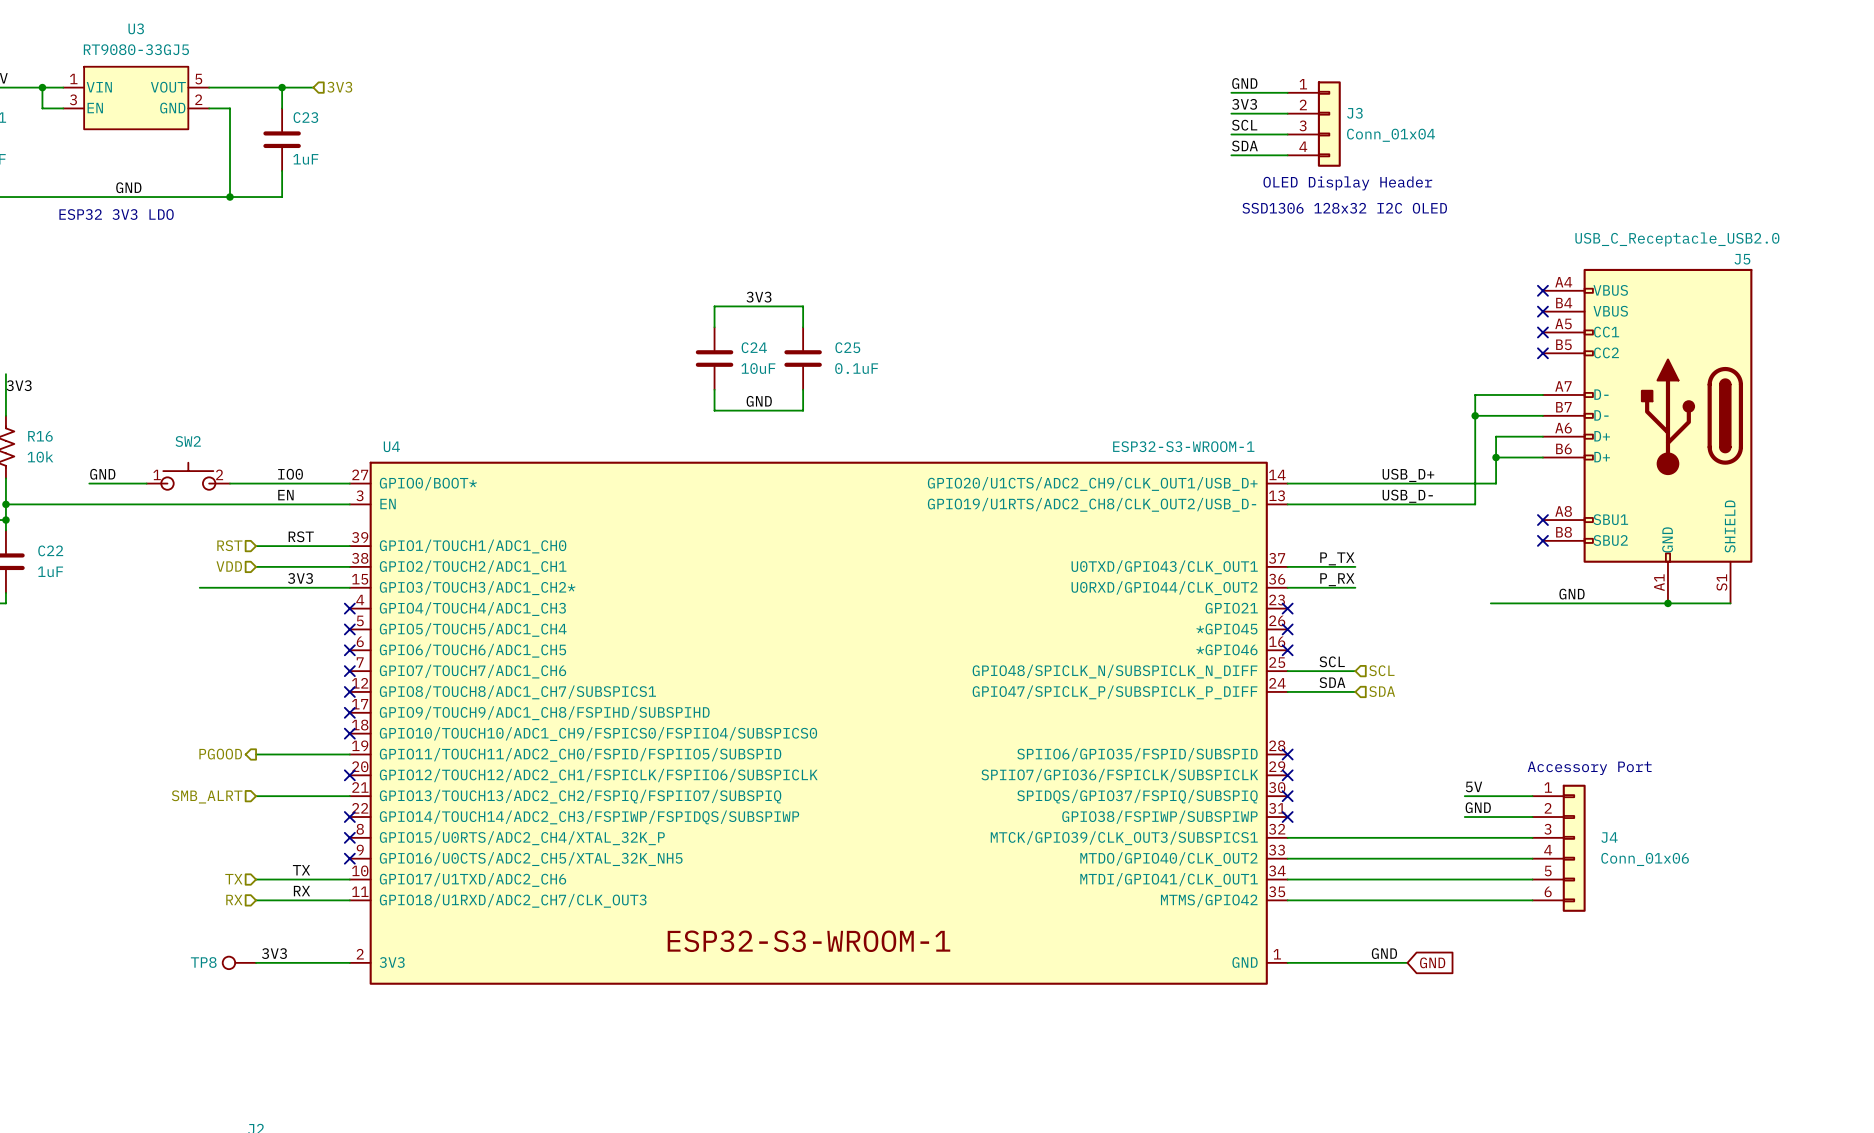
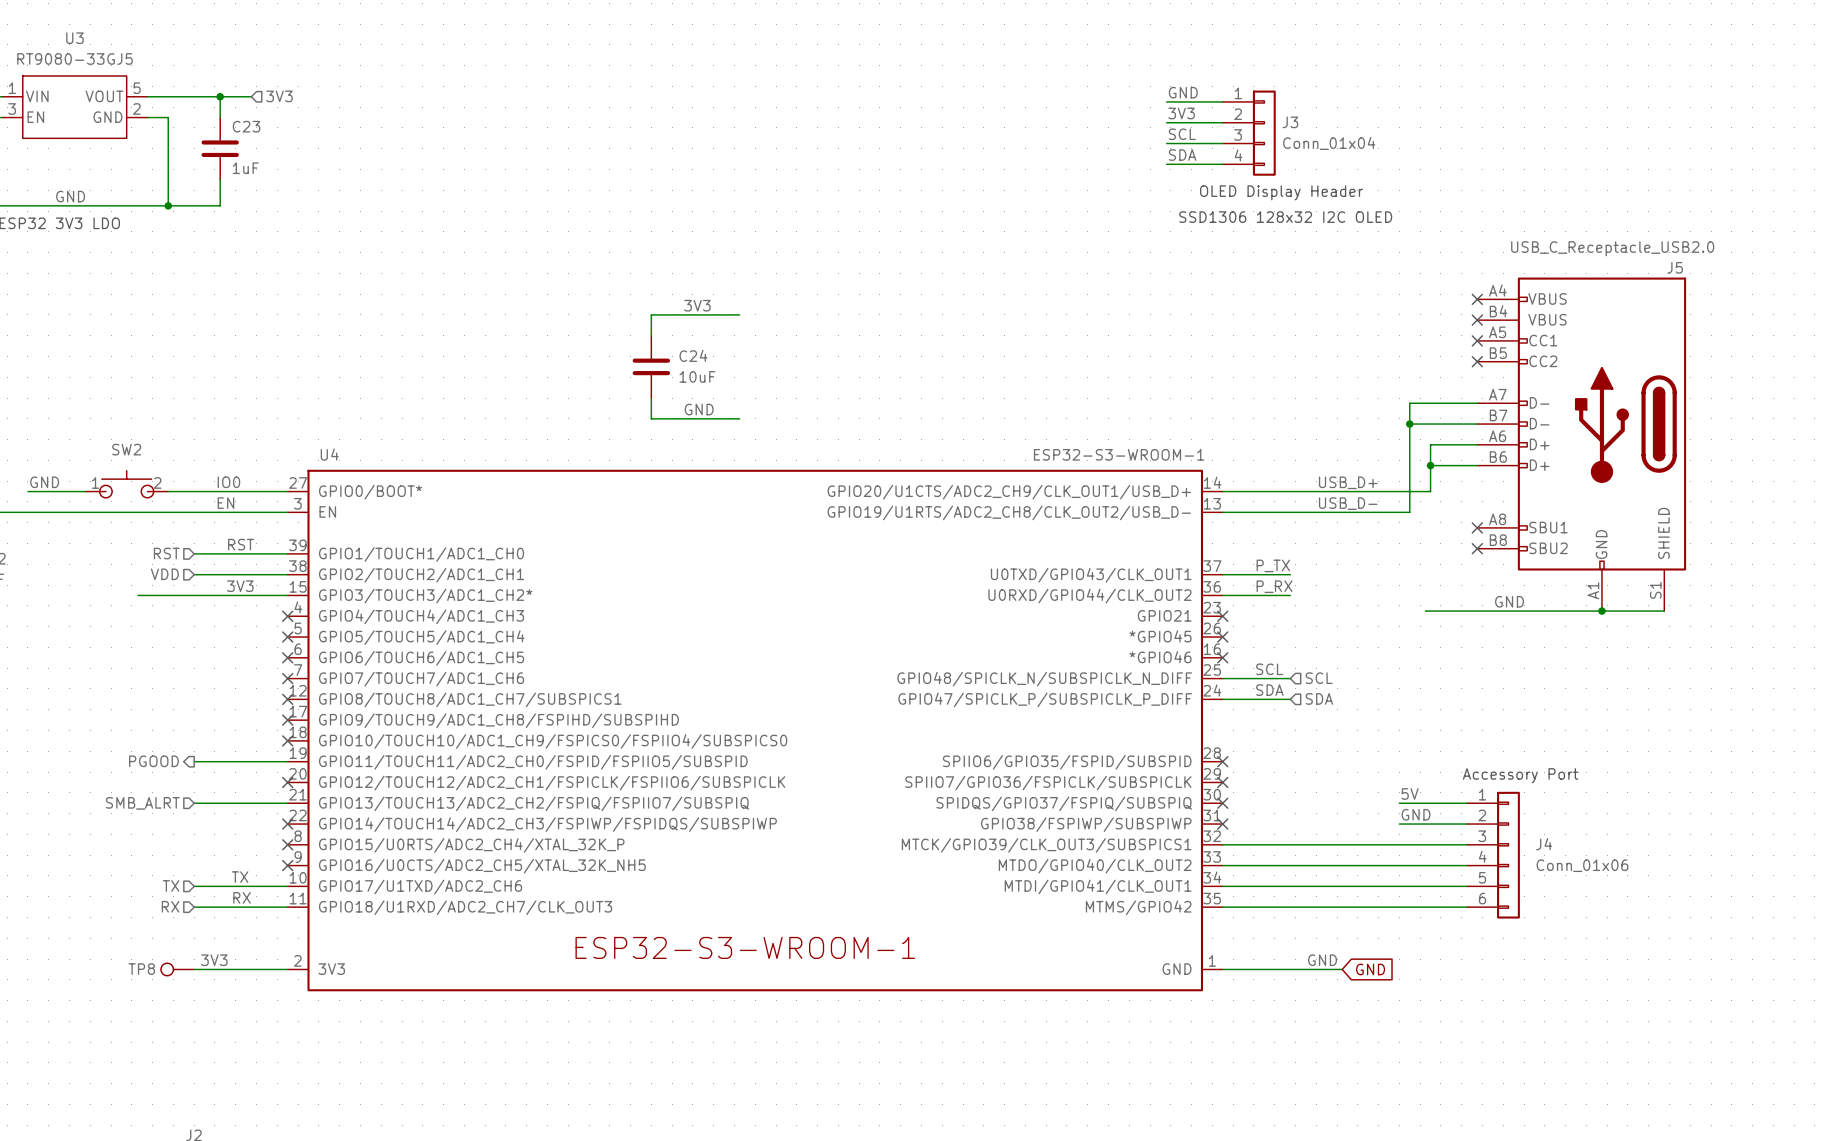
wire: (803, 306) (803, 327) -> none
C25: 0.1uF (803, 358) -> none
wire: (803, 389) (803, 410) -> none

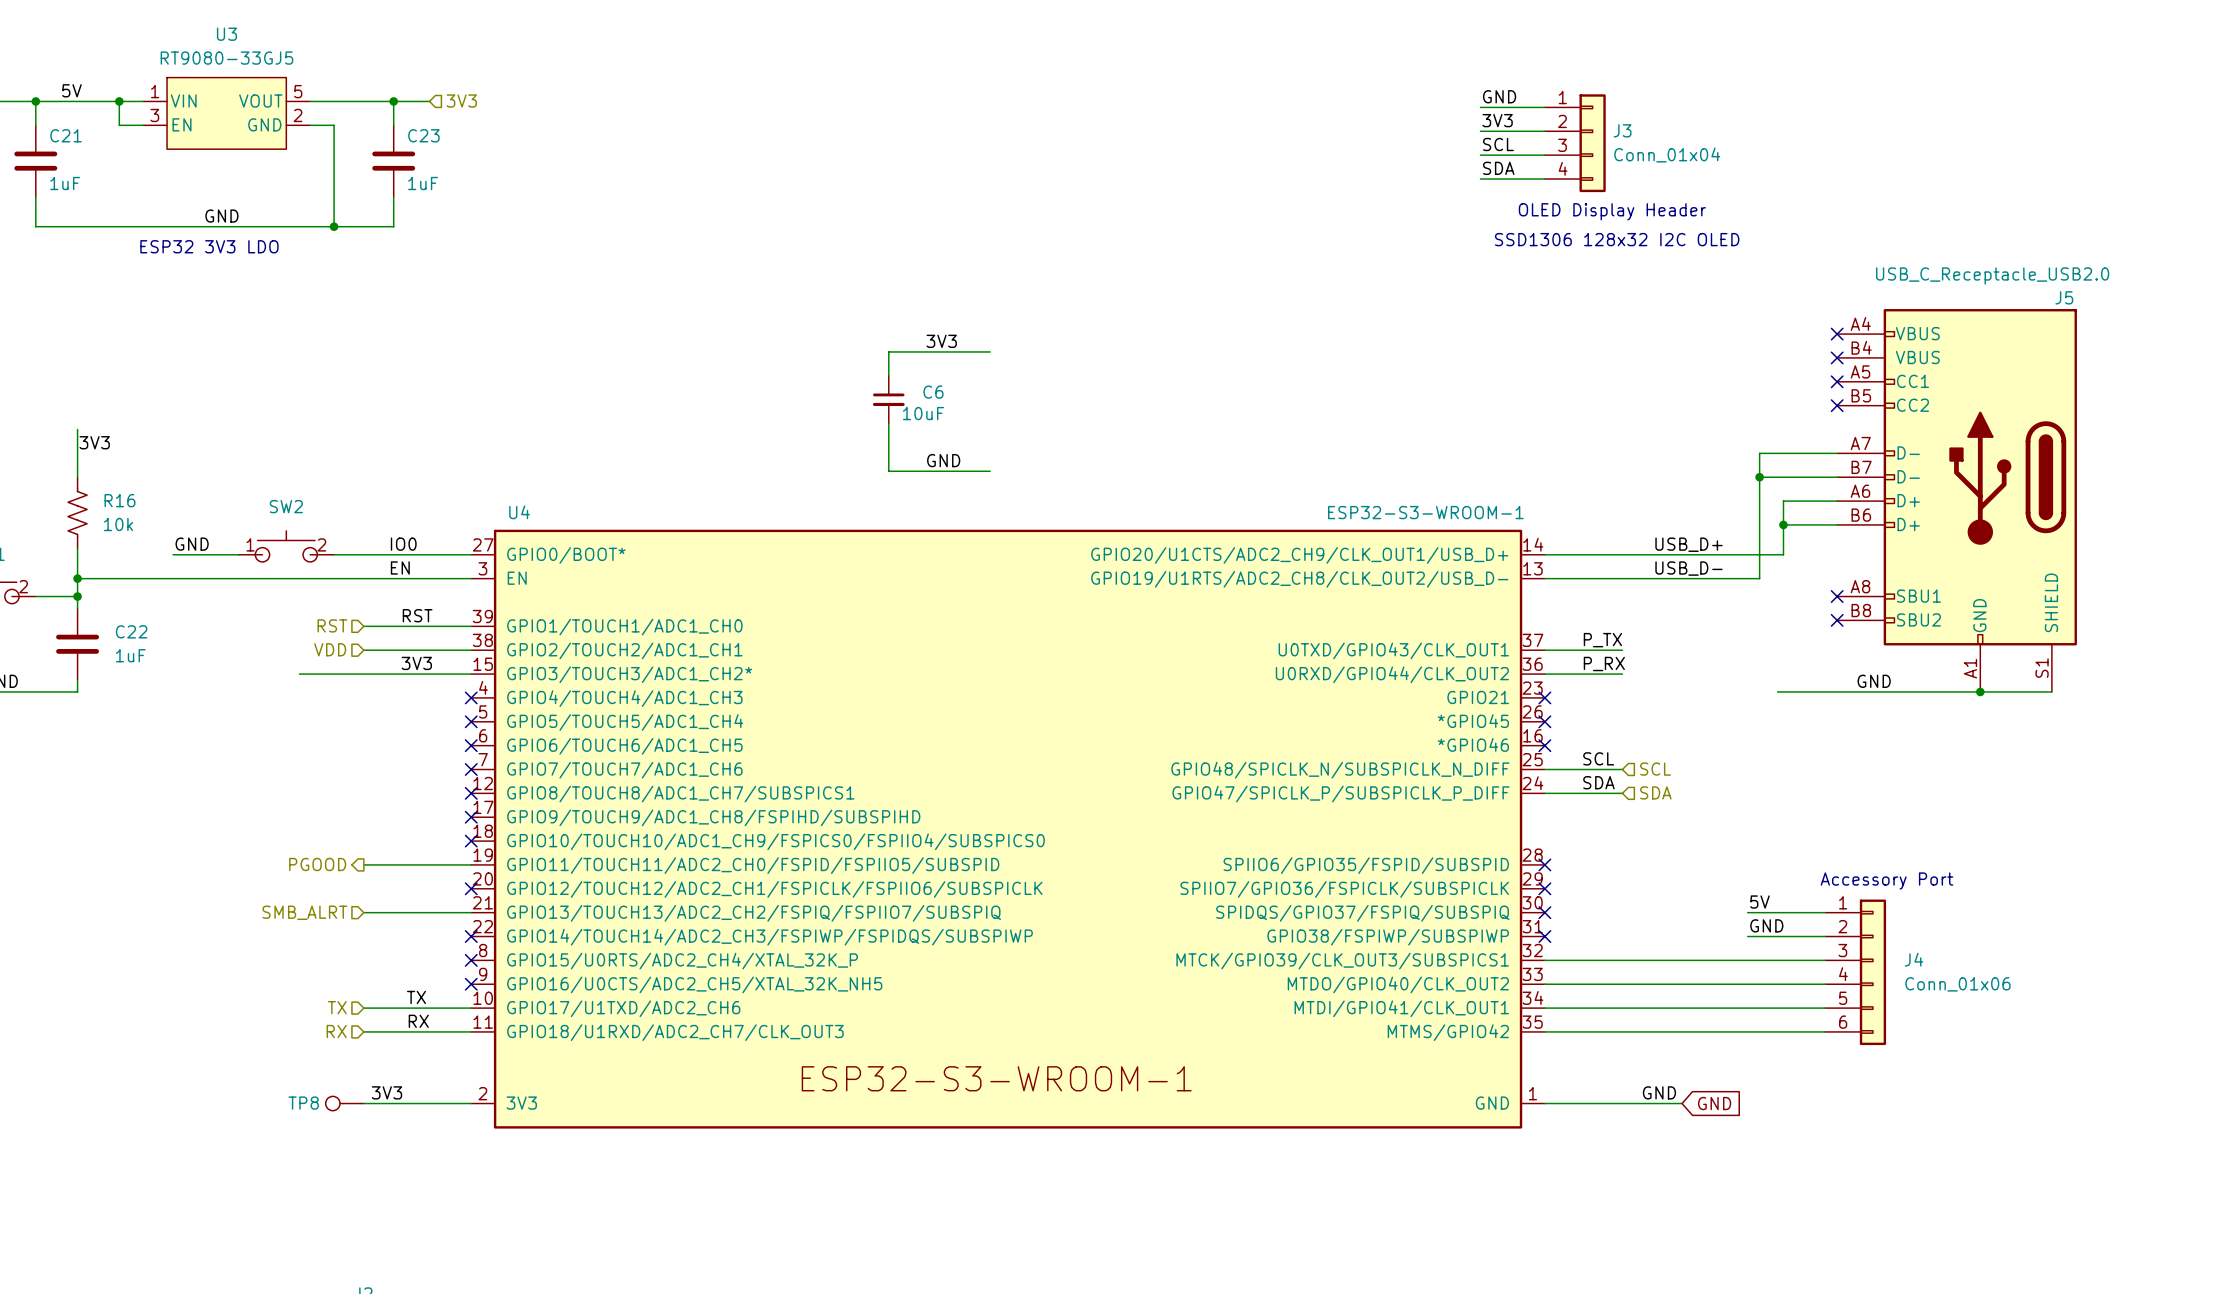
C6: none -> 10uF (888, 399)
C24: 10uF (651, 366) -> none

